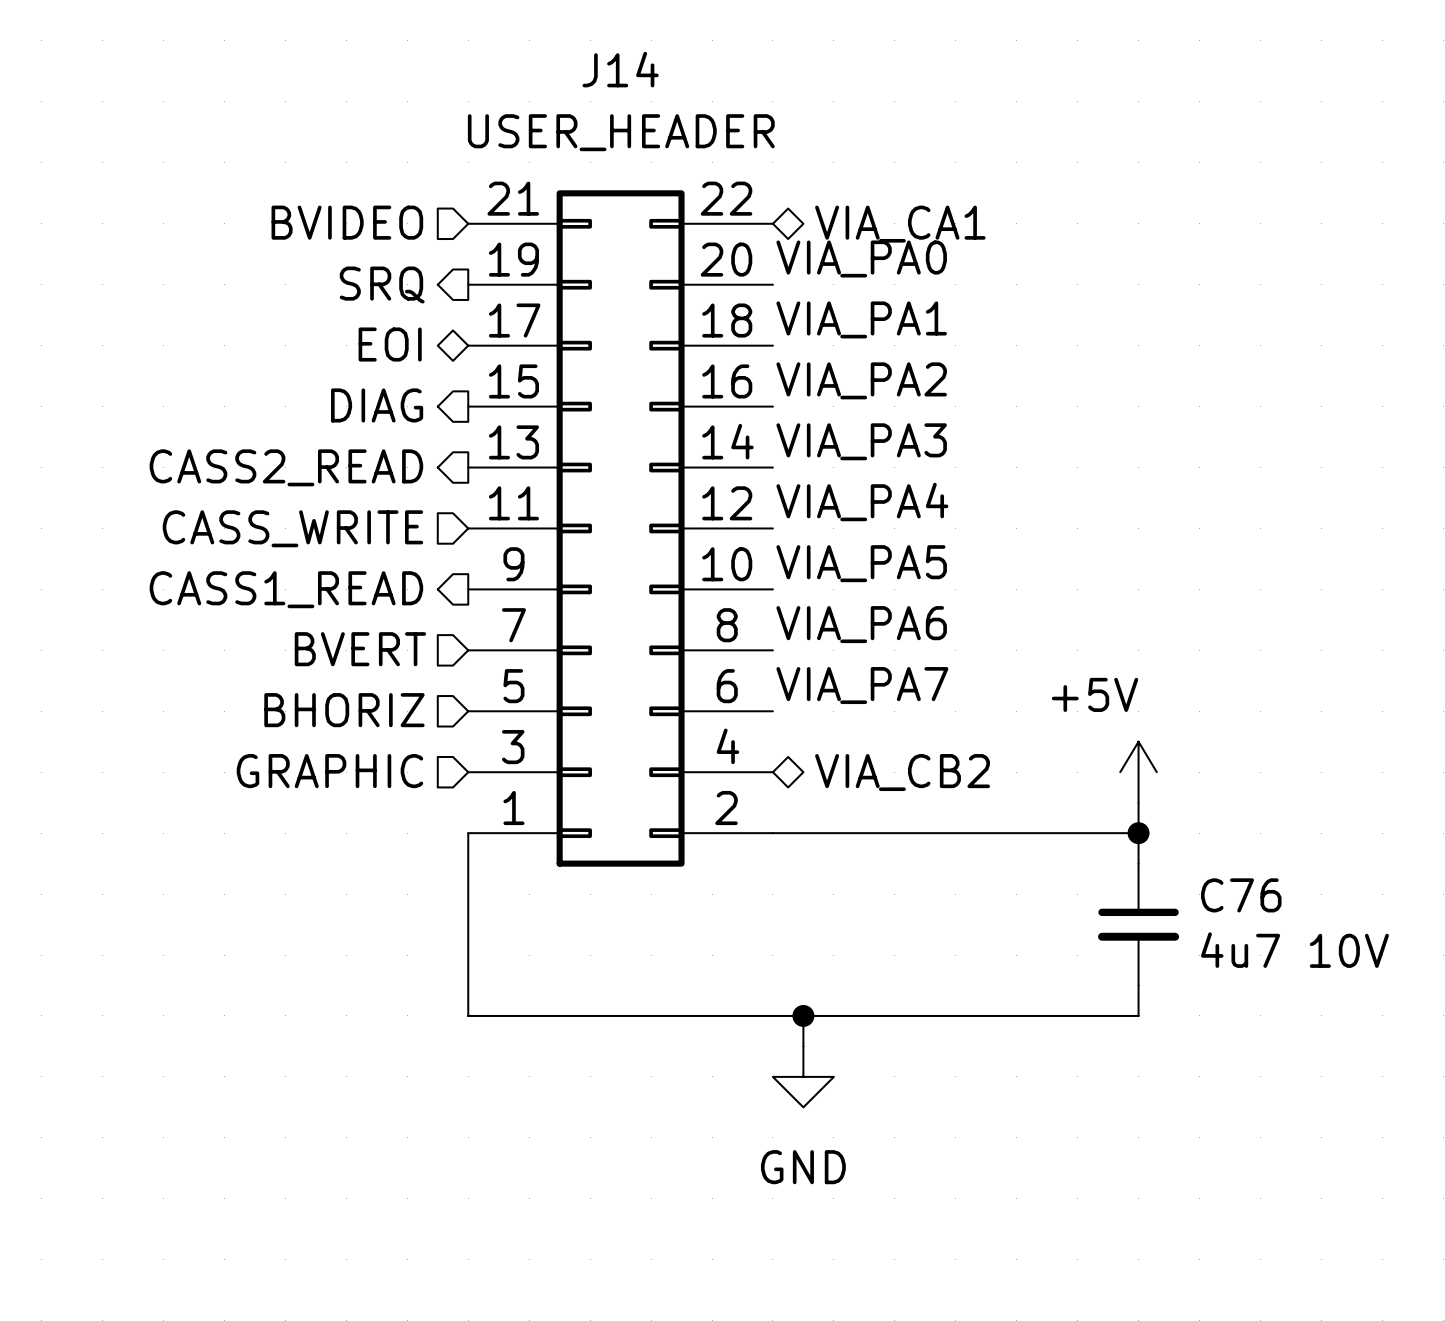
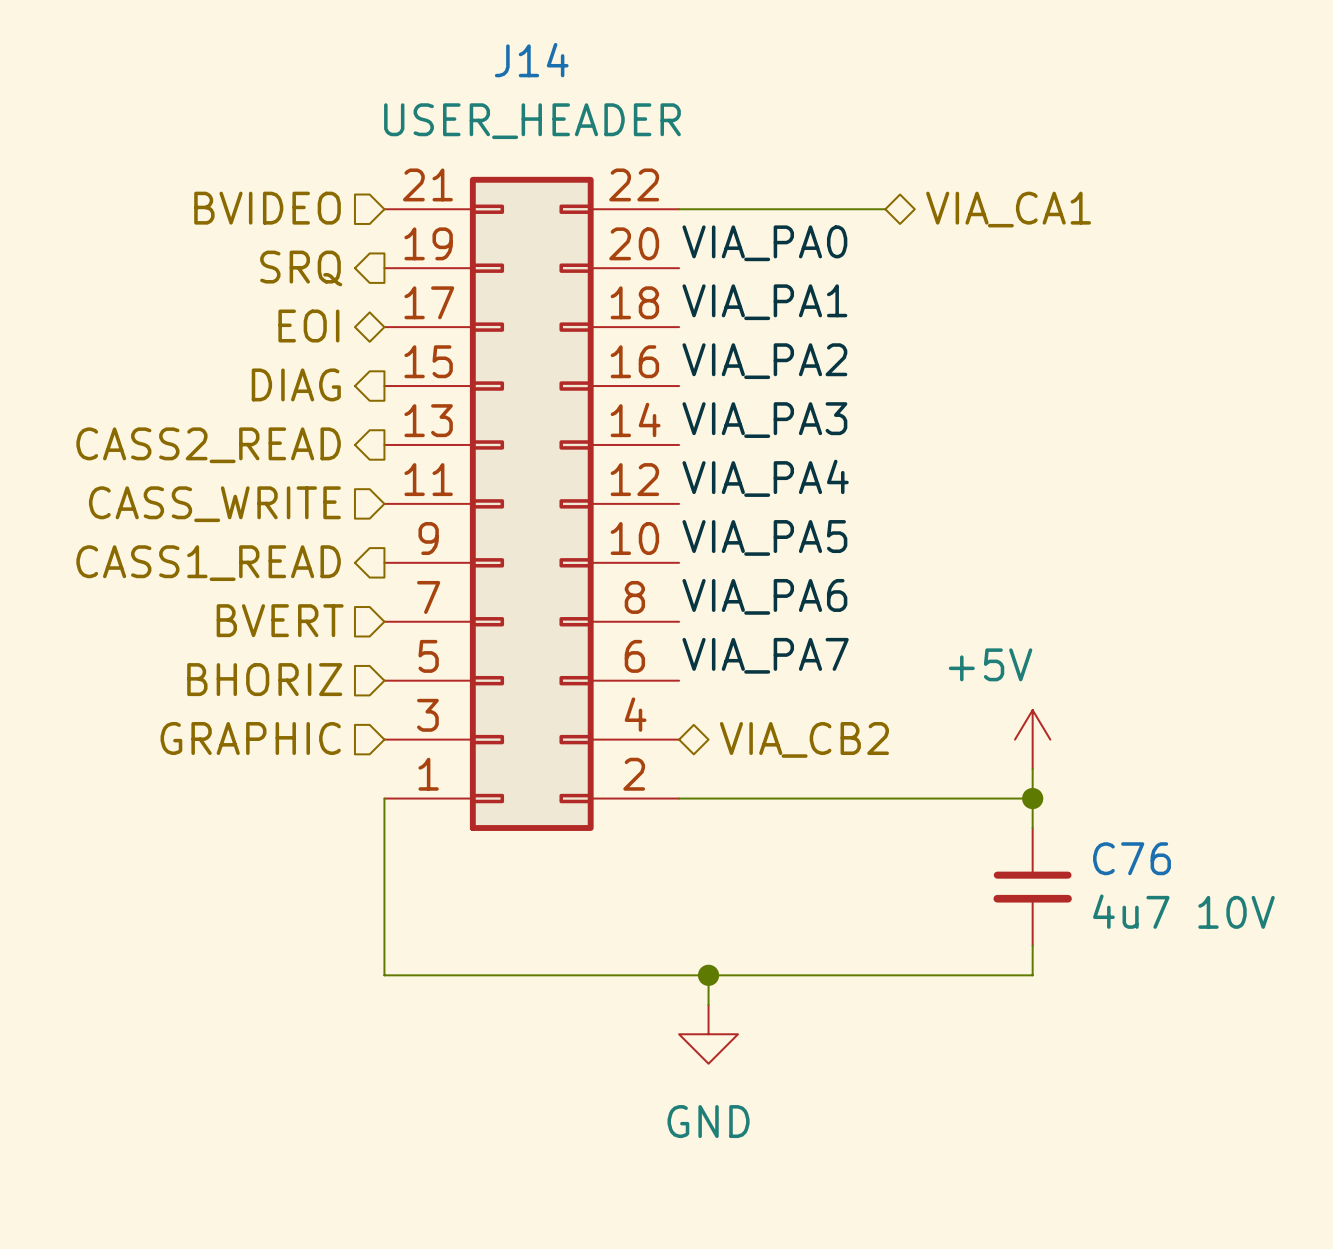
wire: none -> (679, 209) (885, 209)
hierarchical label position: VIA_CA1 (900, 224) -> VIA_CA1 (1008, 209)

